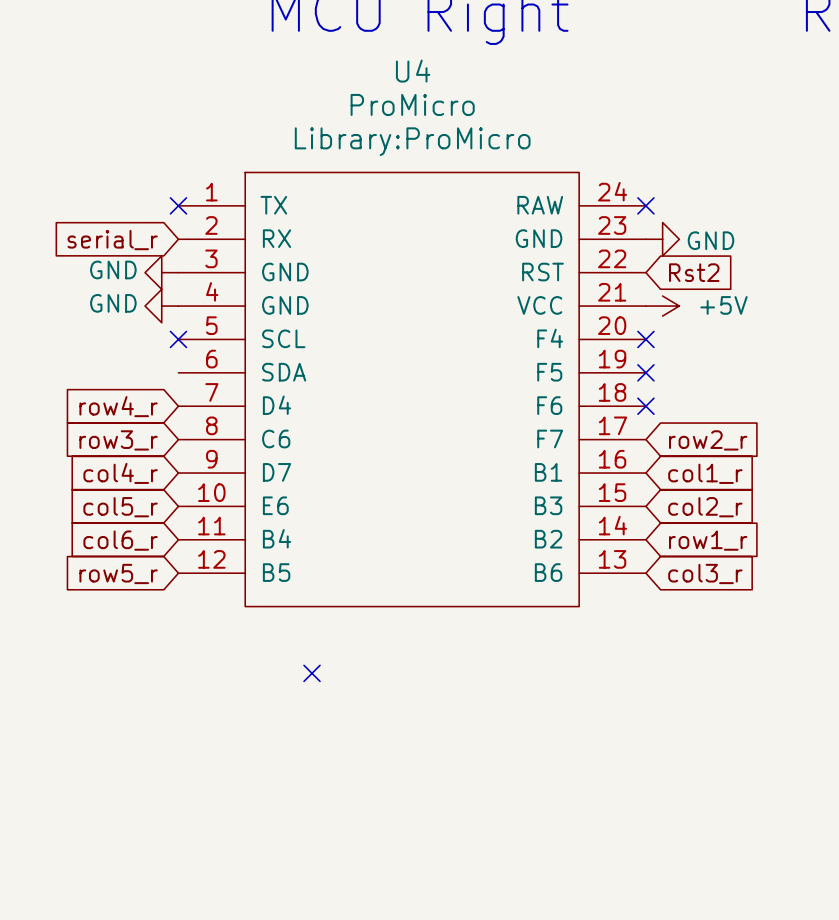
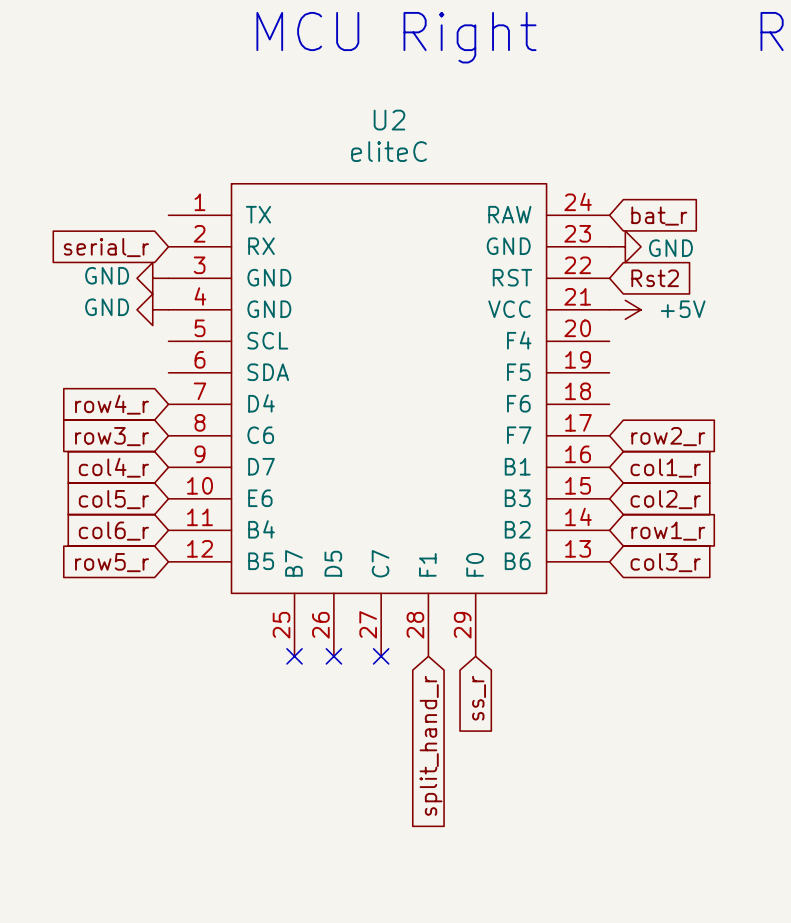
no-connect mark: (178, 205) -> none
no-connect mark: (645, 205) -> none
global label: none -> bat_r (659, 216)
no-connect mark: (178, 339) -> none
no-connect mark: (645, 339) -> none
no-connect mark: (645, 372) -> none
U4: ProMicro (412, 389) -> none
no-connect mark: (645, 406) -> none
U2: none -> eliteC (389, 420)
no-connect mark: none -> (333, 656)
no-connect mark: none -> (381, 656)
global label: none -> ss_r (479, 698)
global label: none -> split_hand_r (431, 745)

